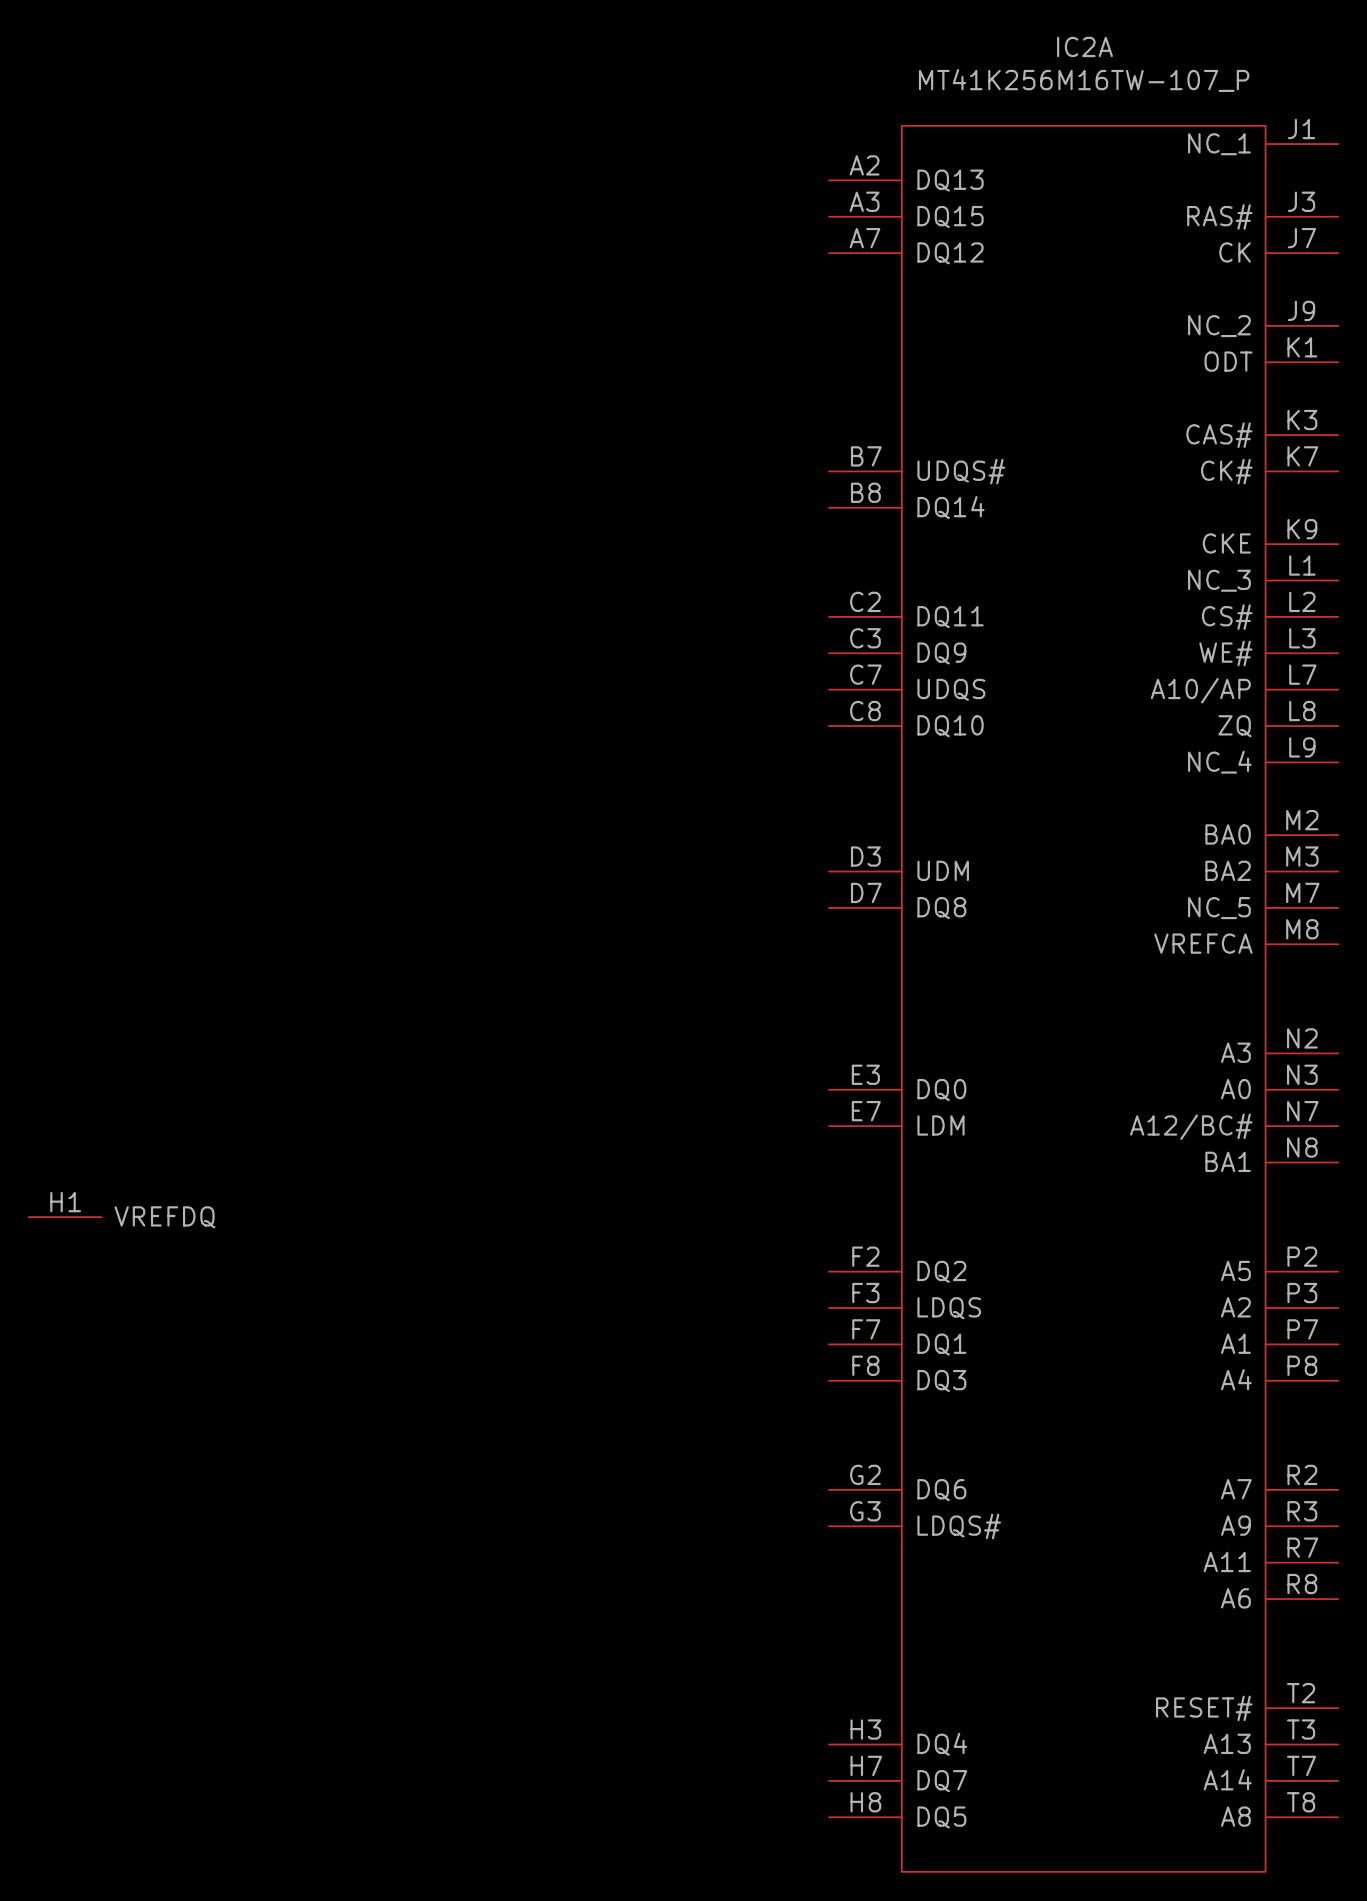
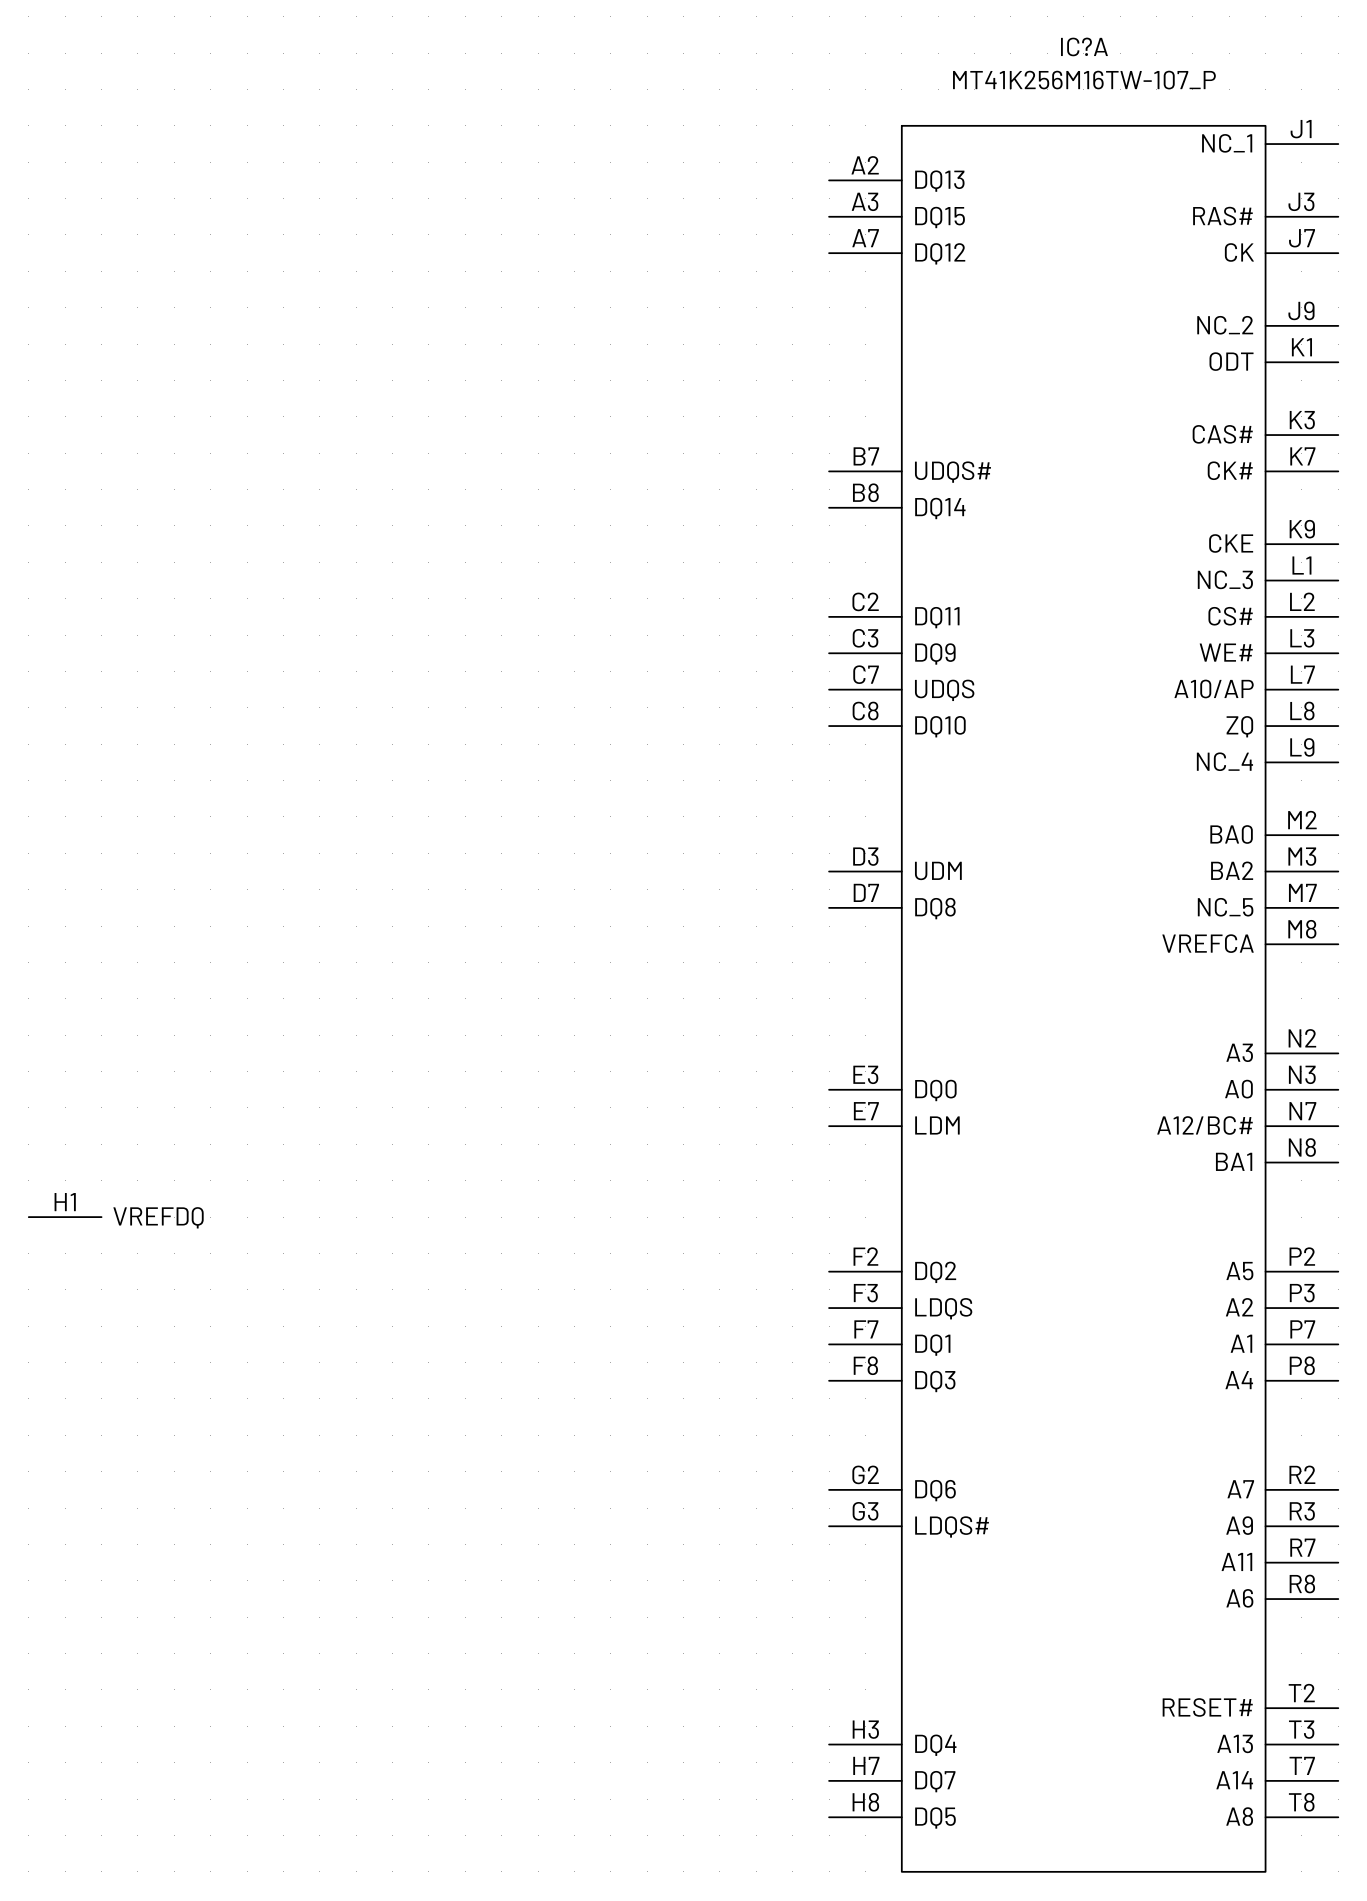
IC2A name: IC2A (1084, 46) -> IC?A (1084, 46)

